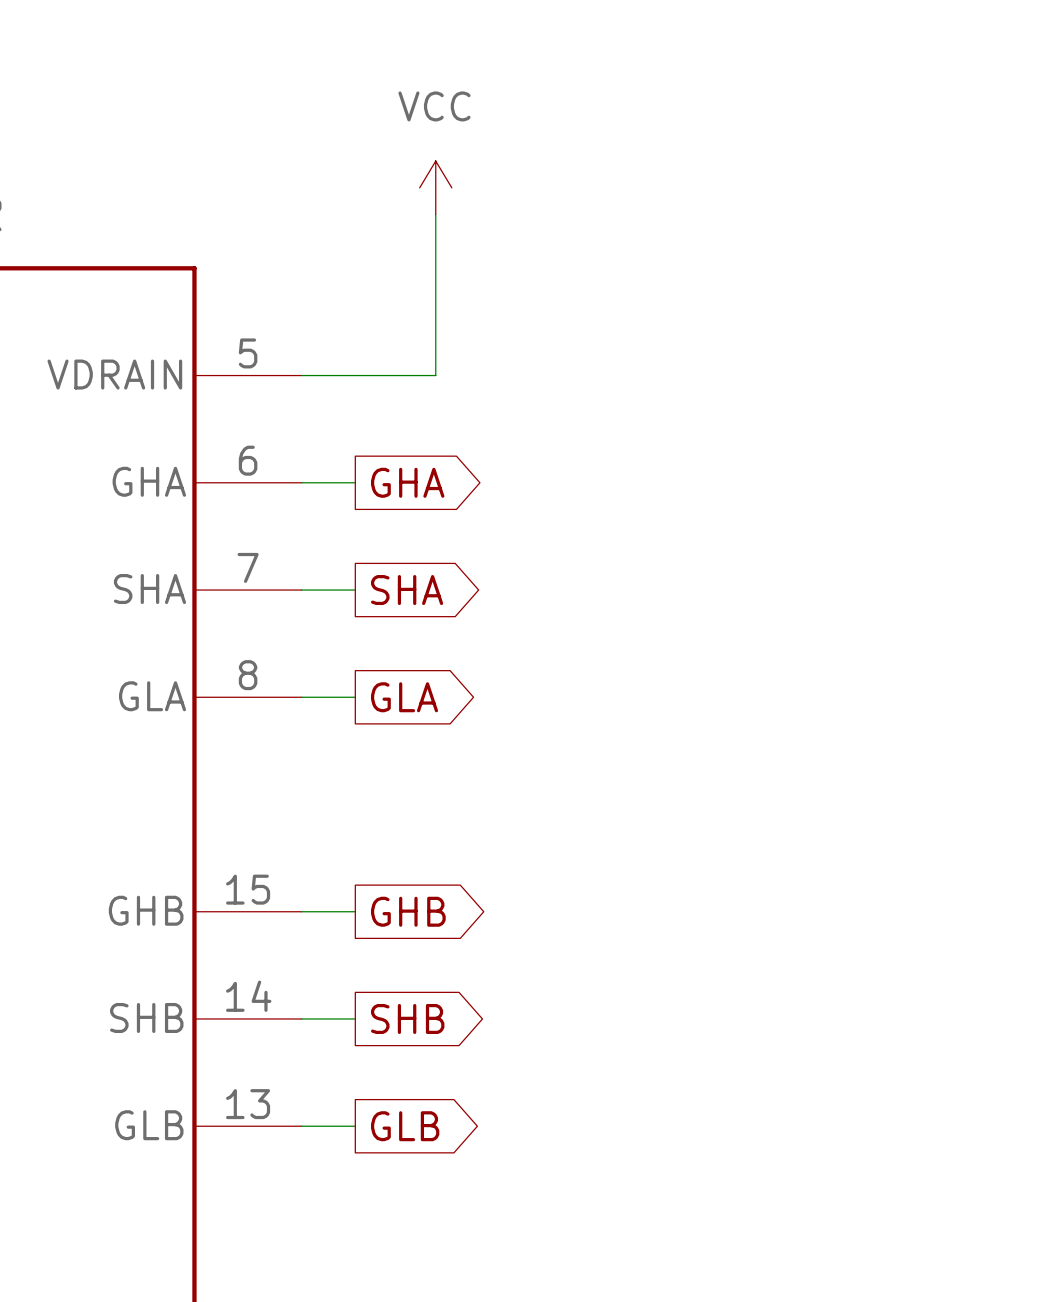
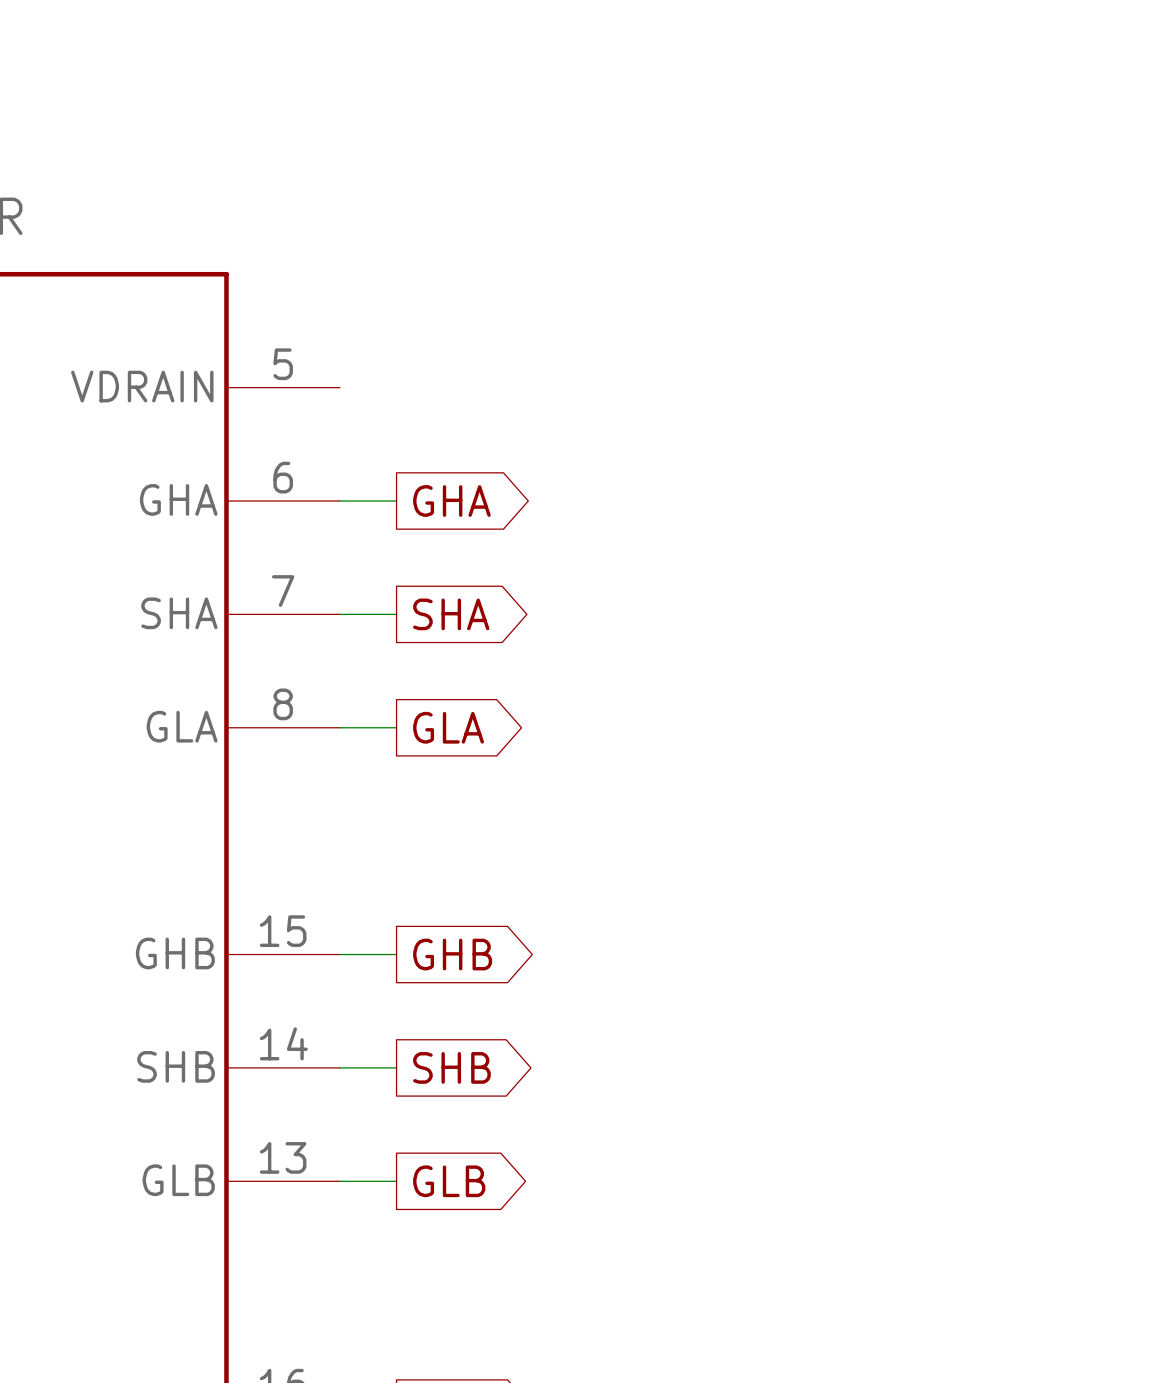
power symbol: VCC (435, 187) -> none
wire: (435, 214) (435, 375) (301, 375) -> none

